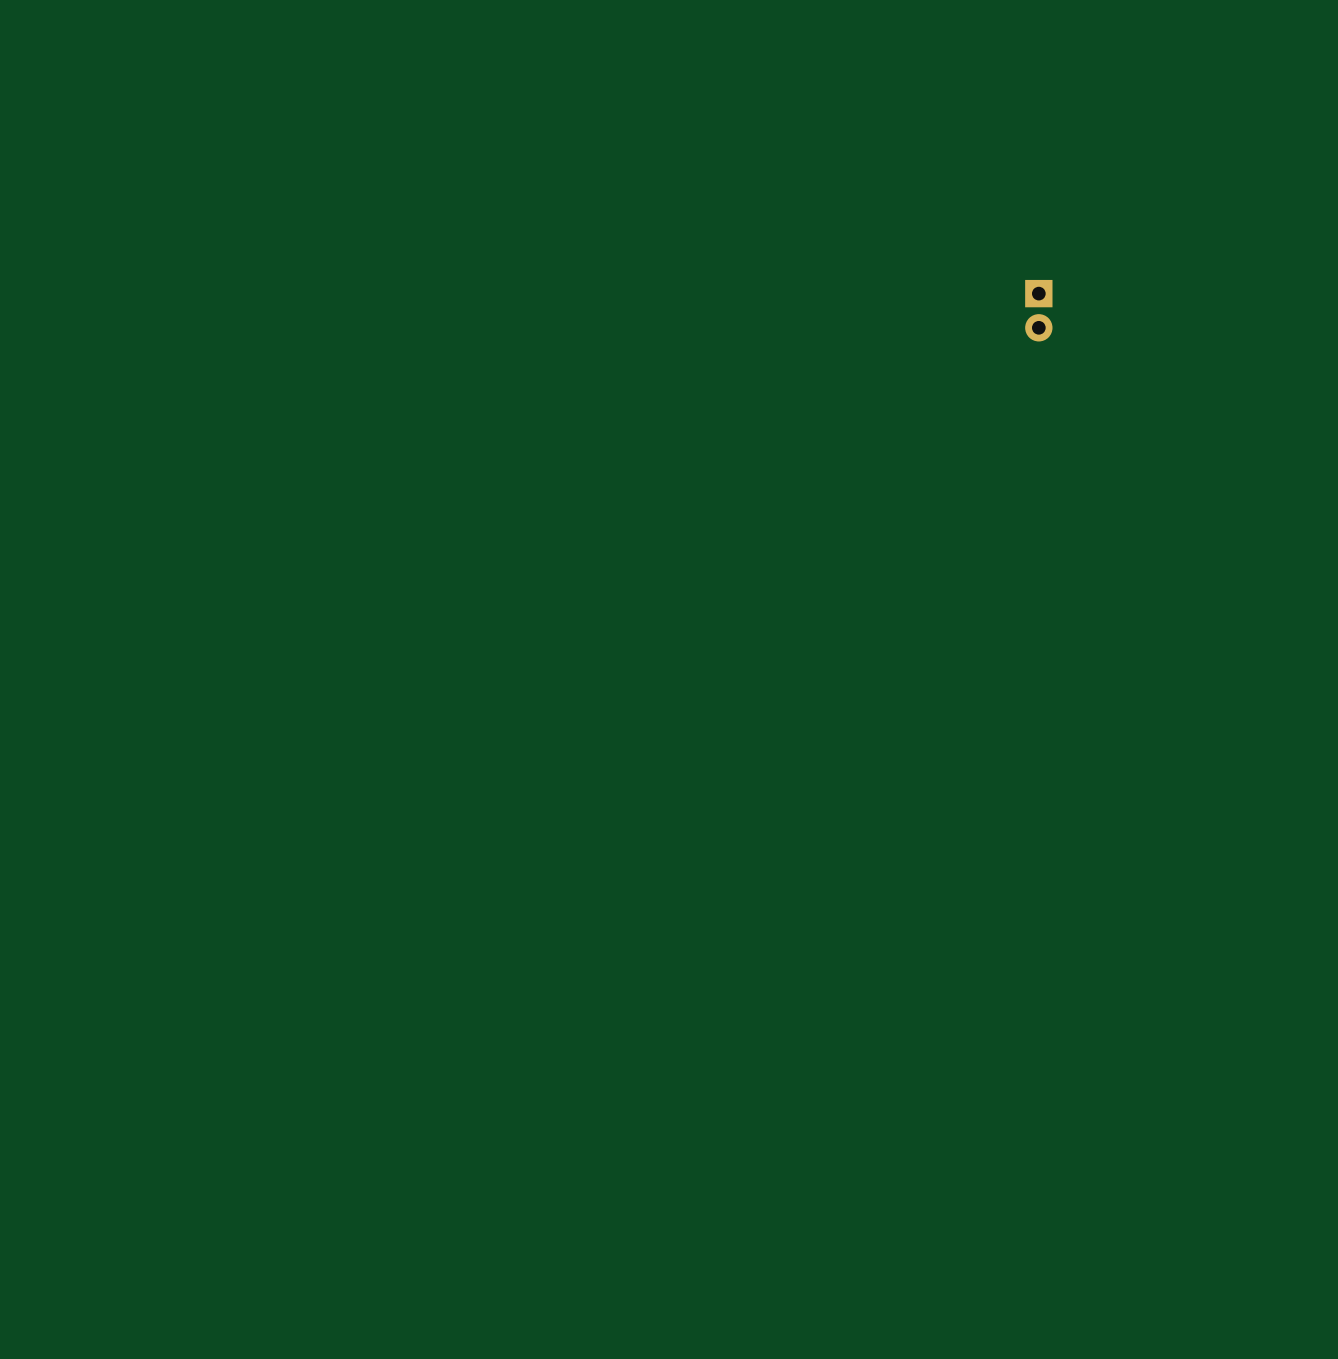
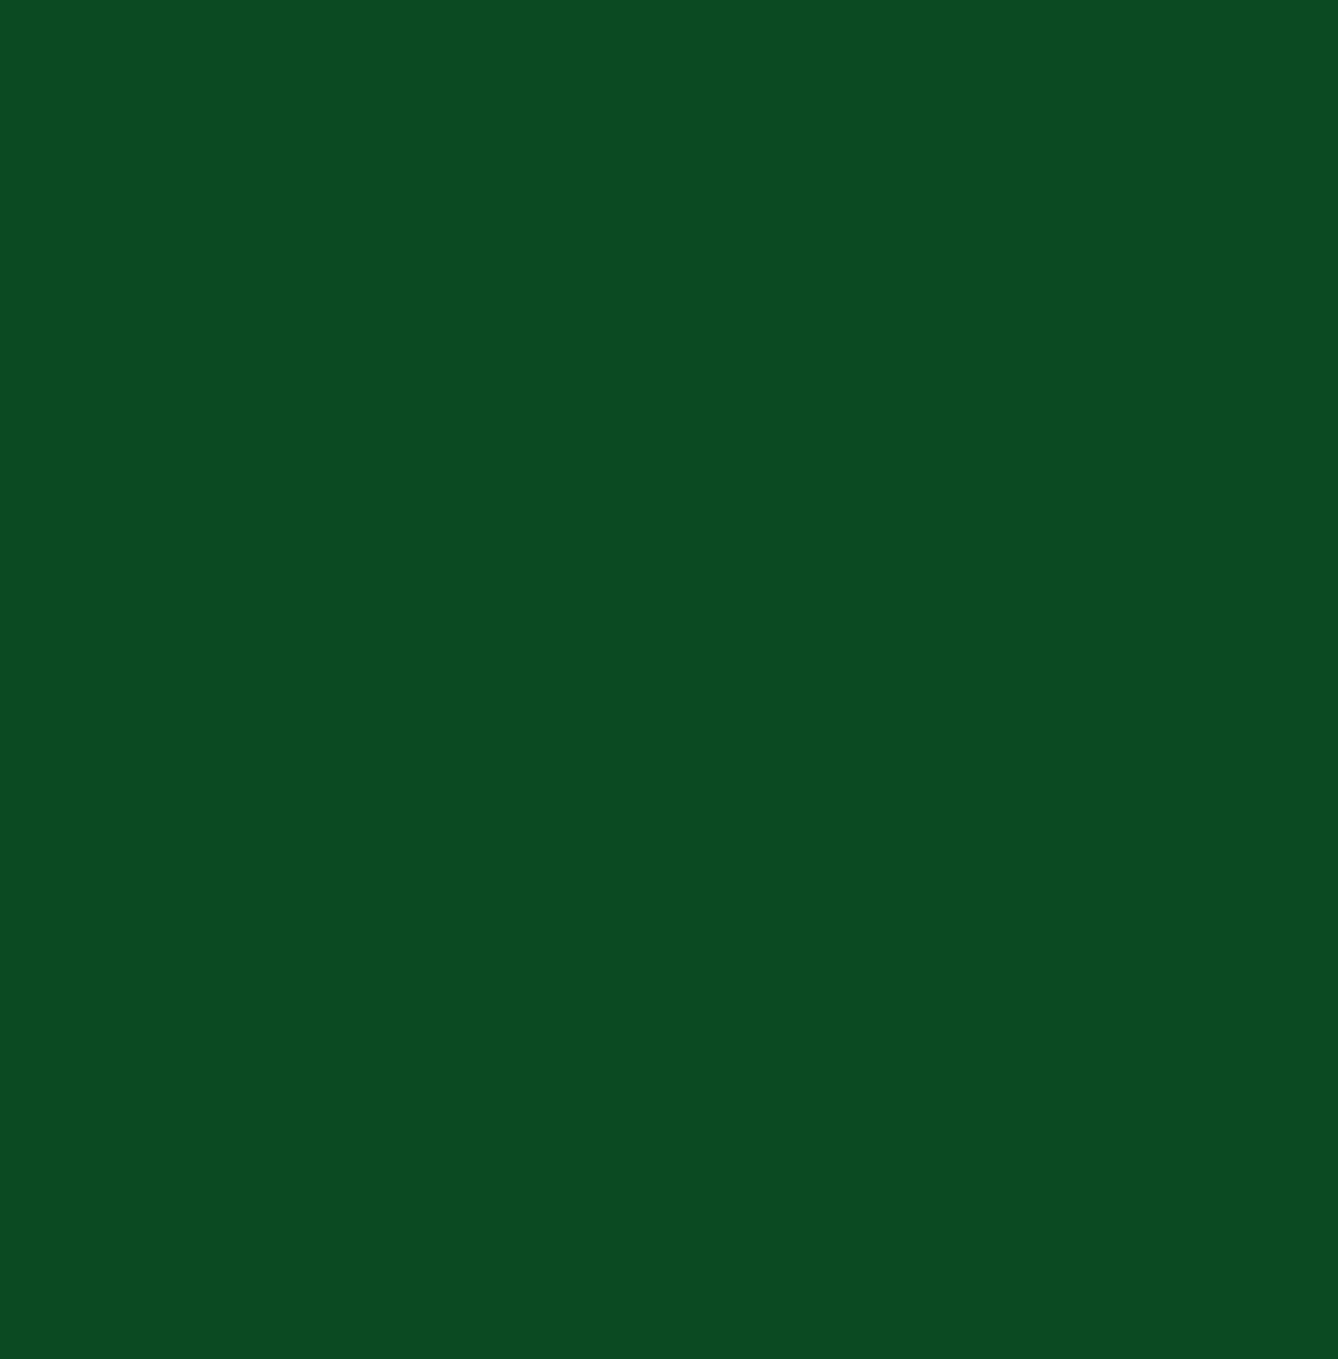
part: (1038, 310) -> none

